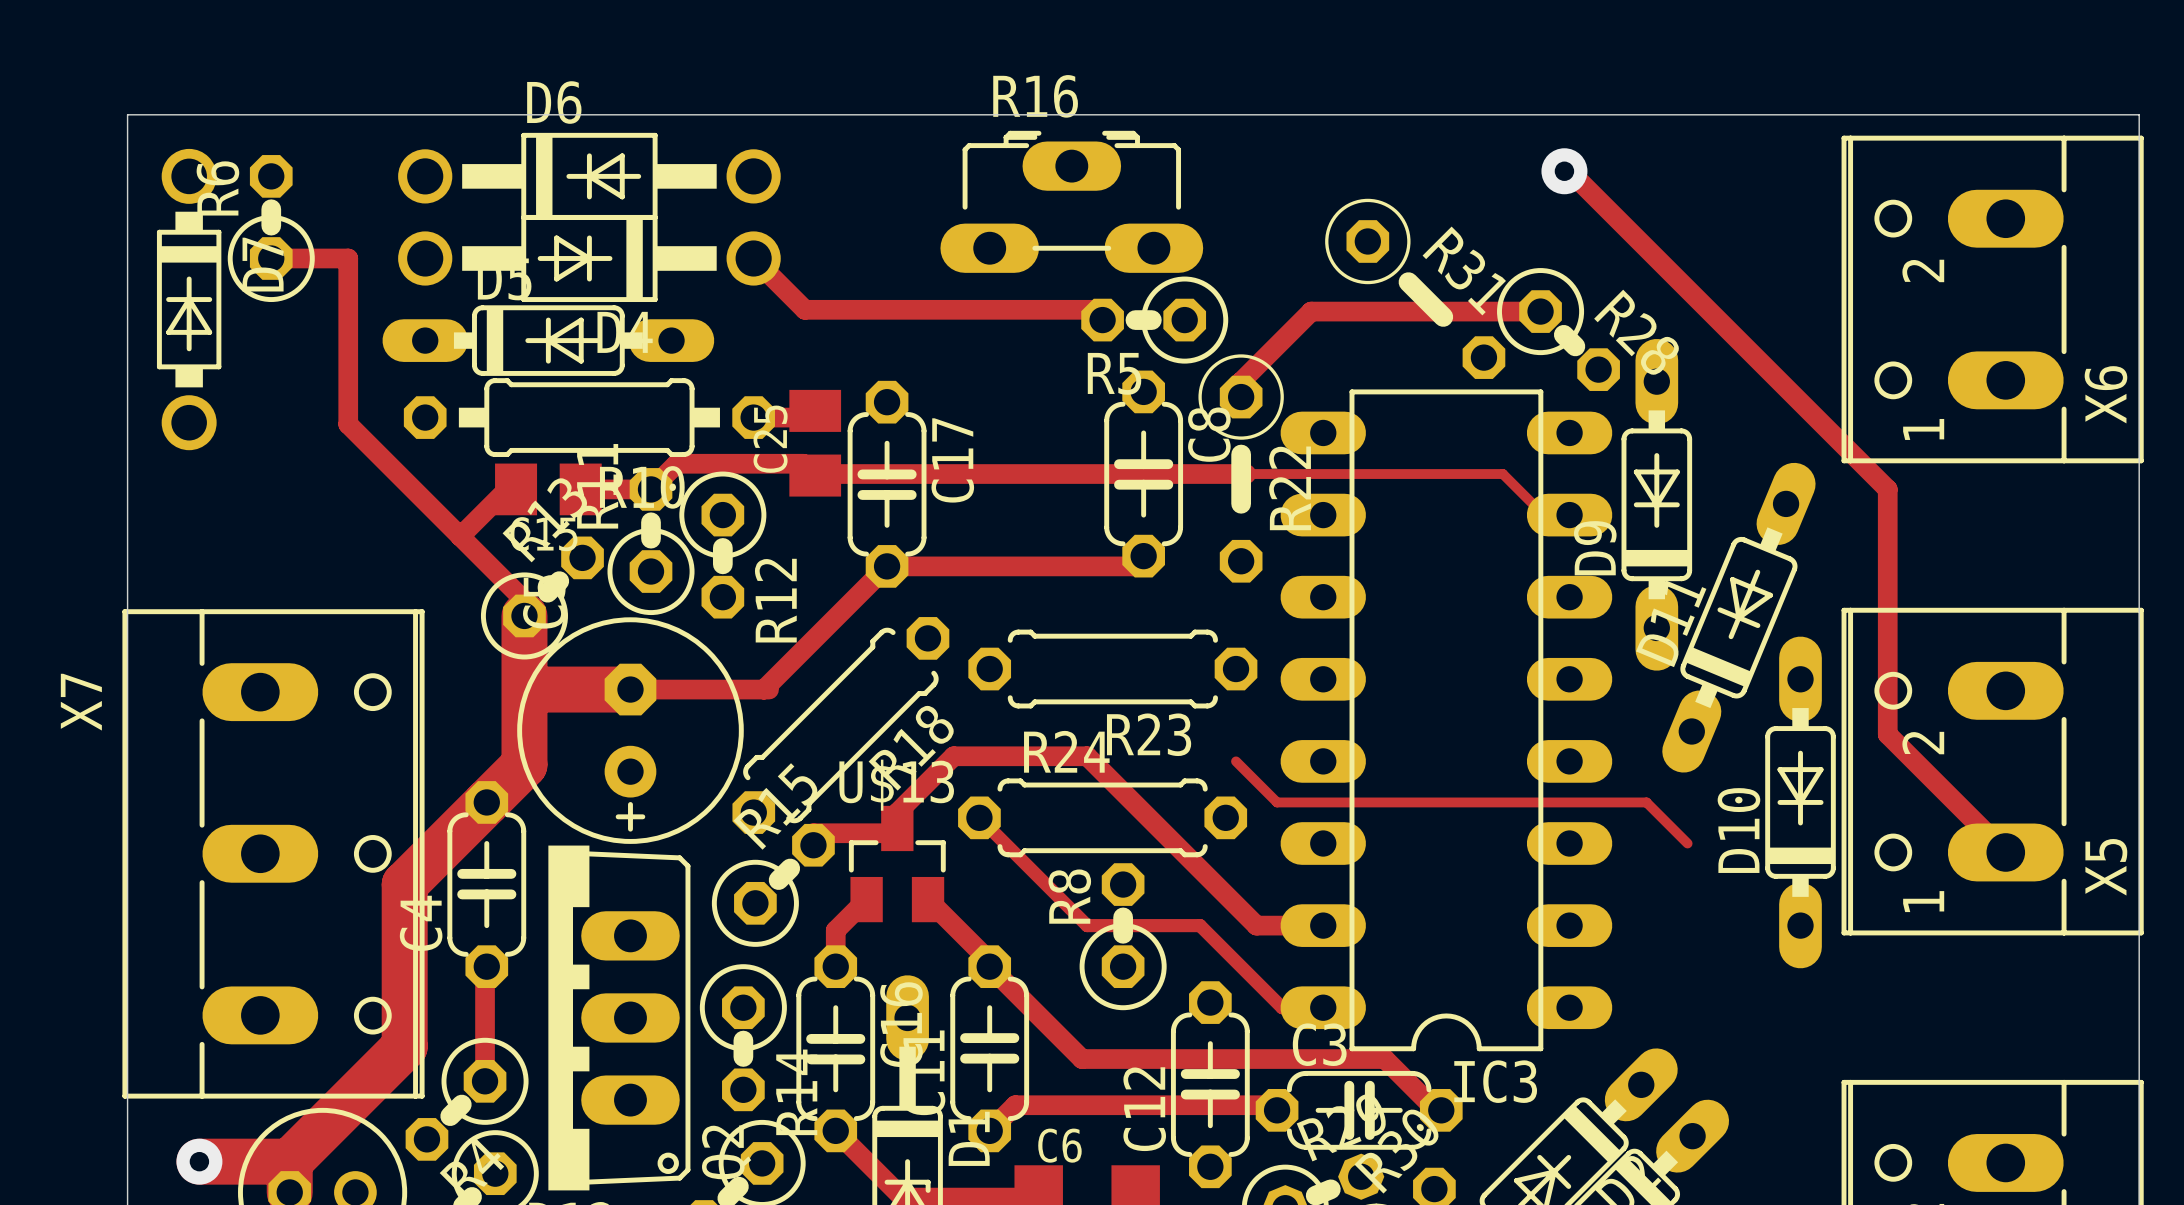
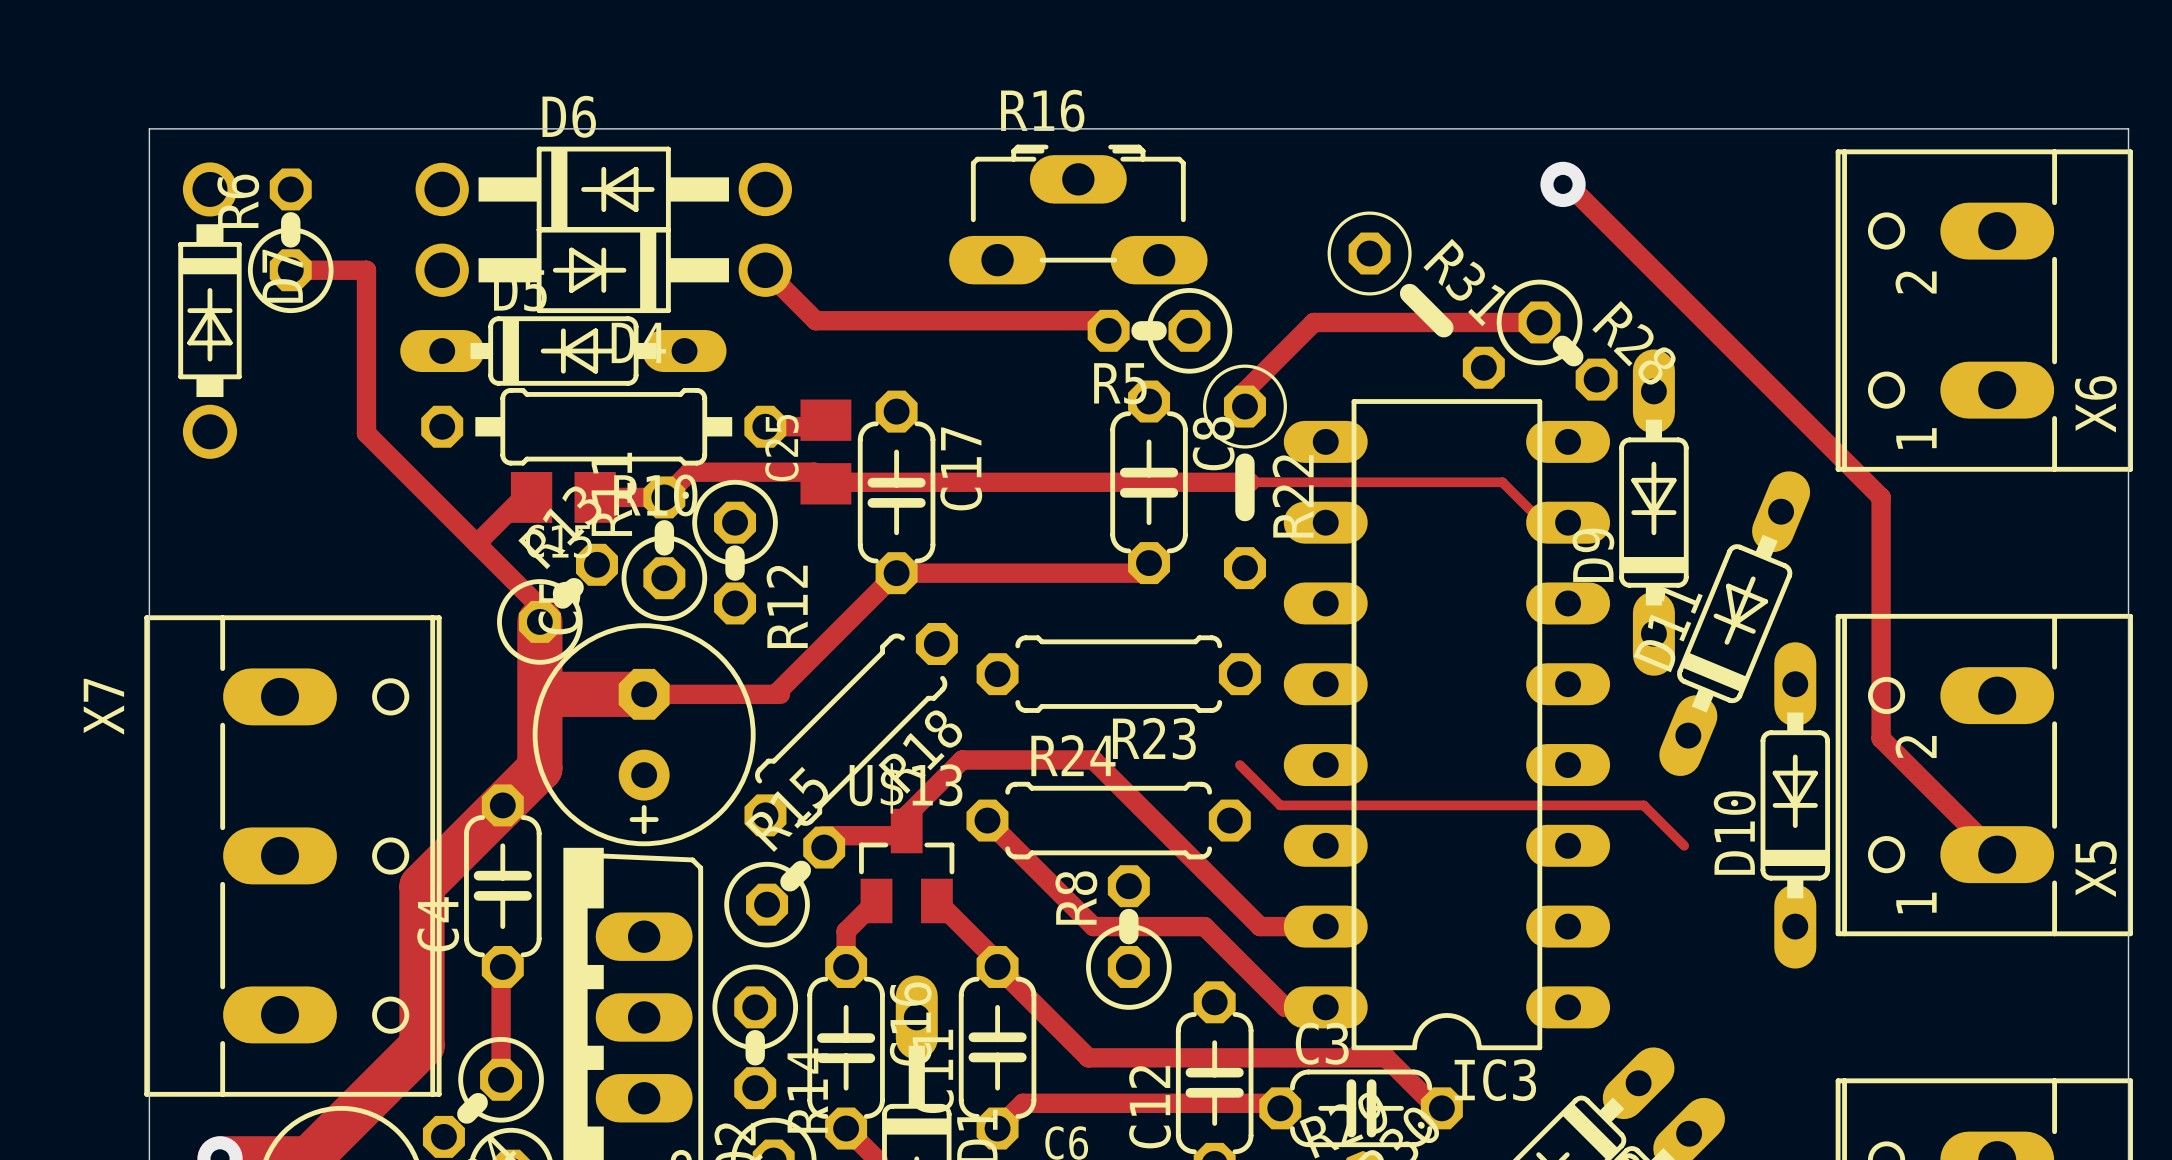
track width: thin (979, 817) (1087, 925) (1200, 925) (1282, 1007) (1323, 1007) -> thick (987, 820) (1093, 926) (1204, 926) (1285, 1007) (1325, 1007)

